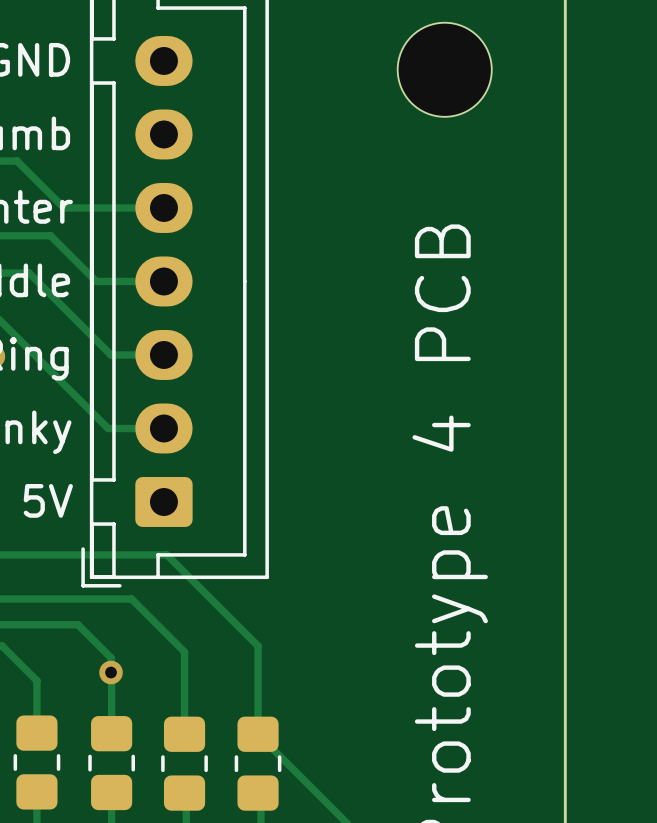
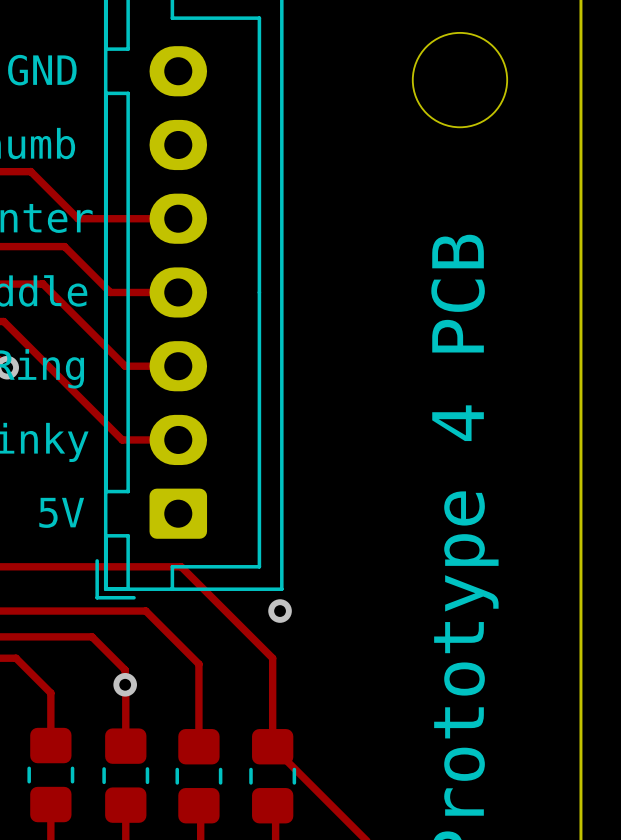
via: none -> (280, 611)

